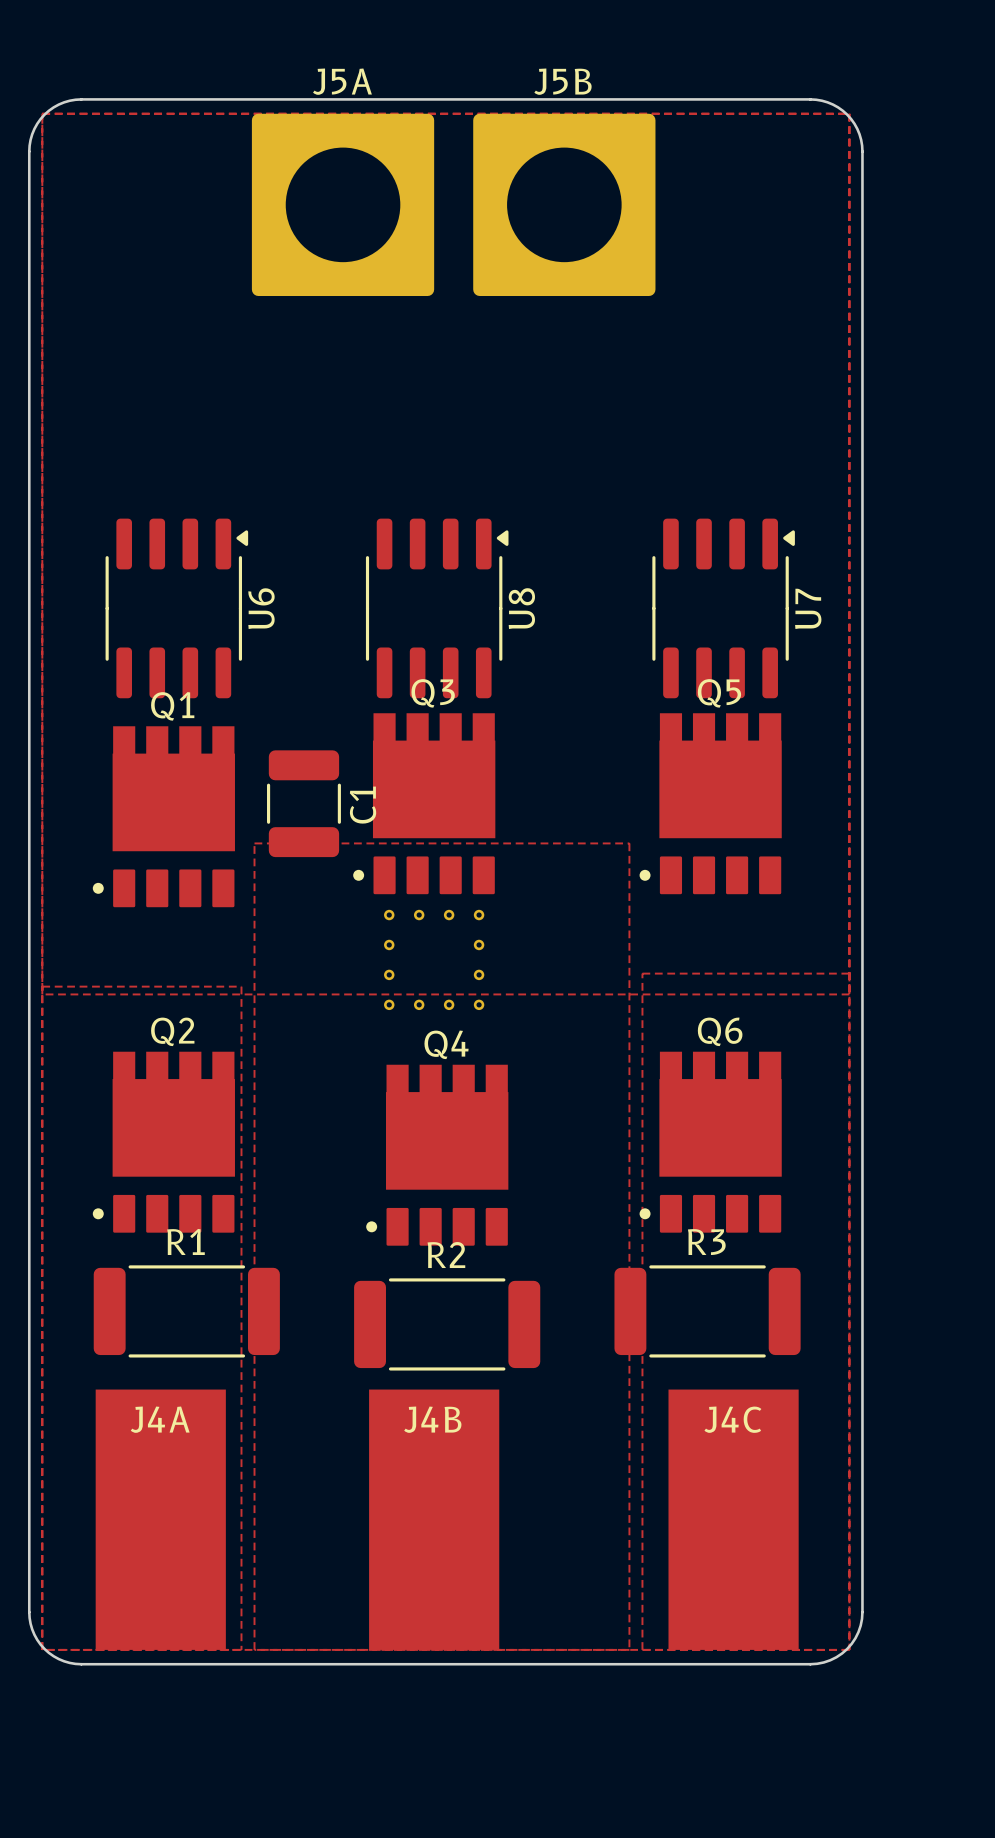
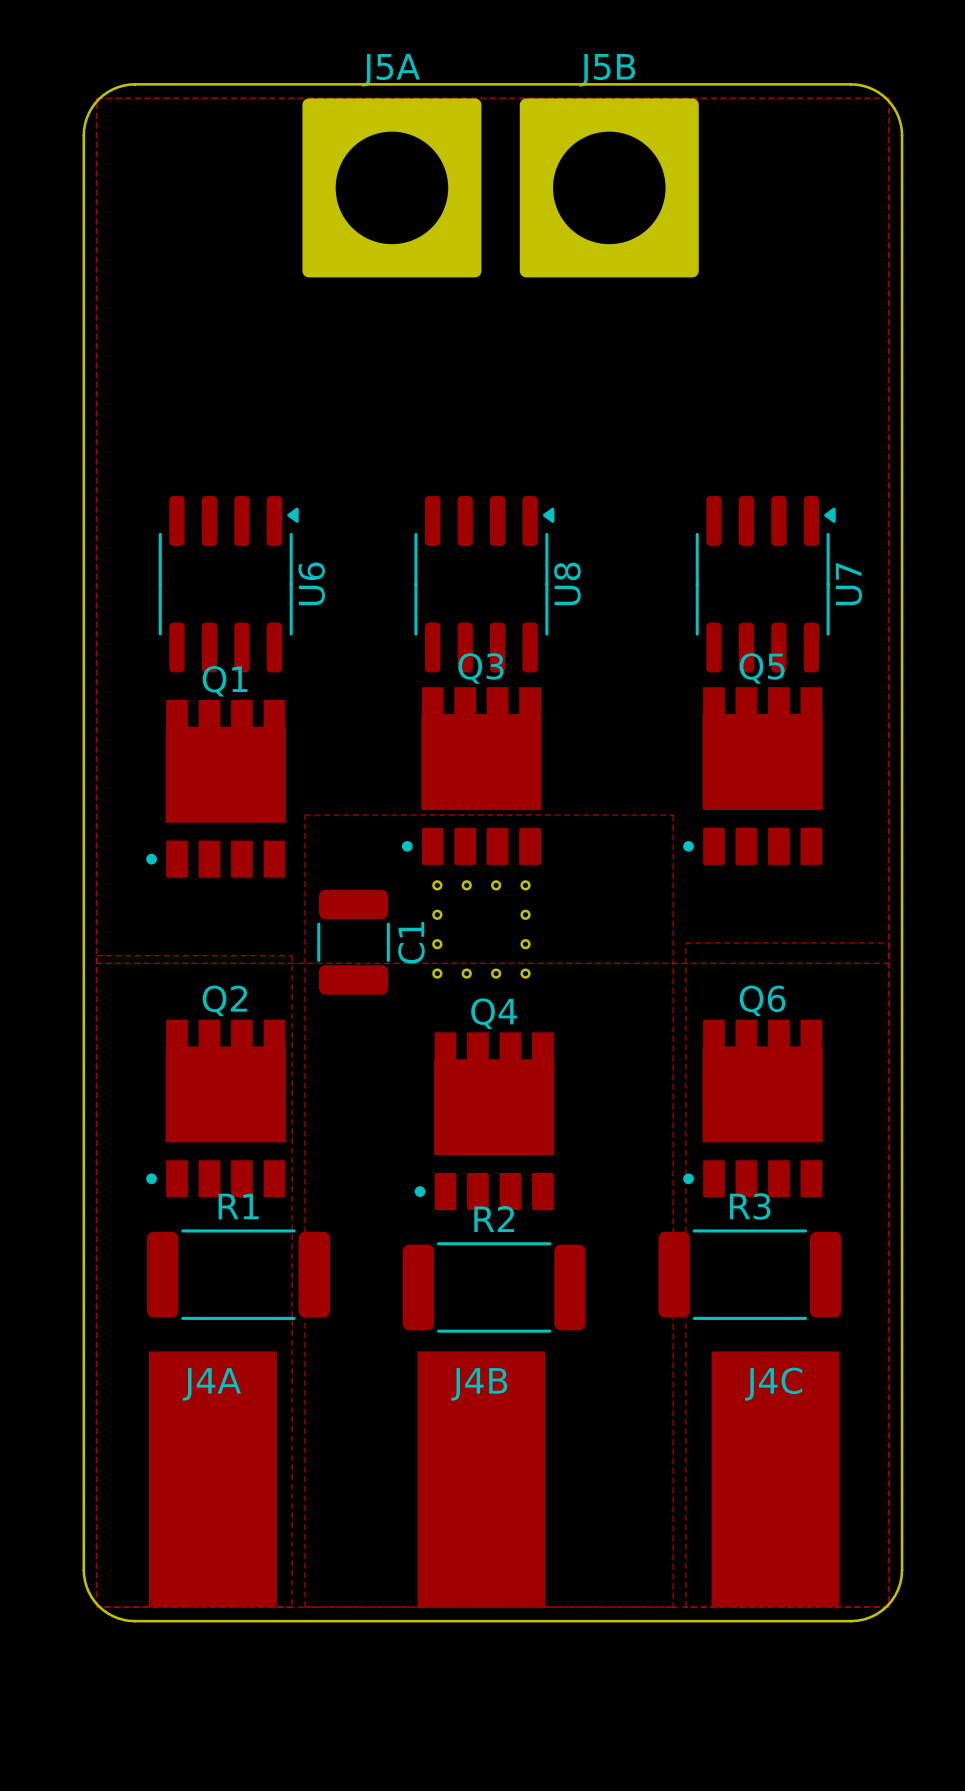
C1 position: (303, 803) -> (353, 942)

